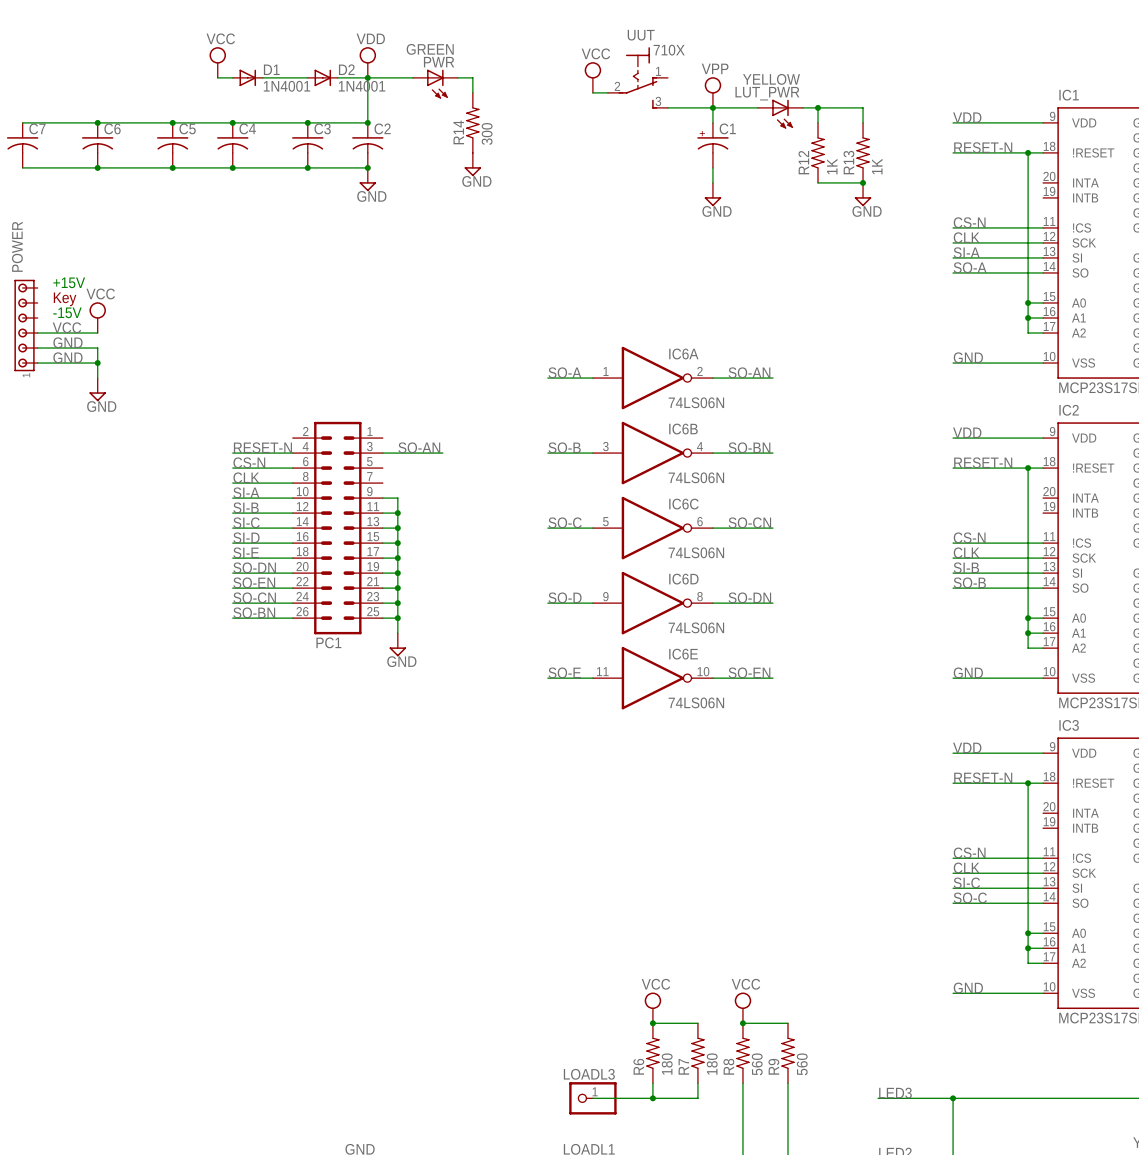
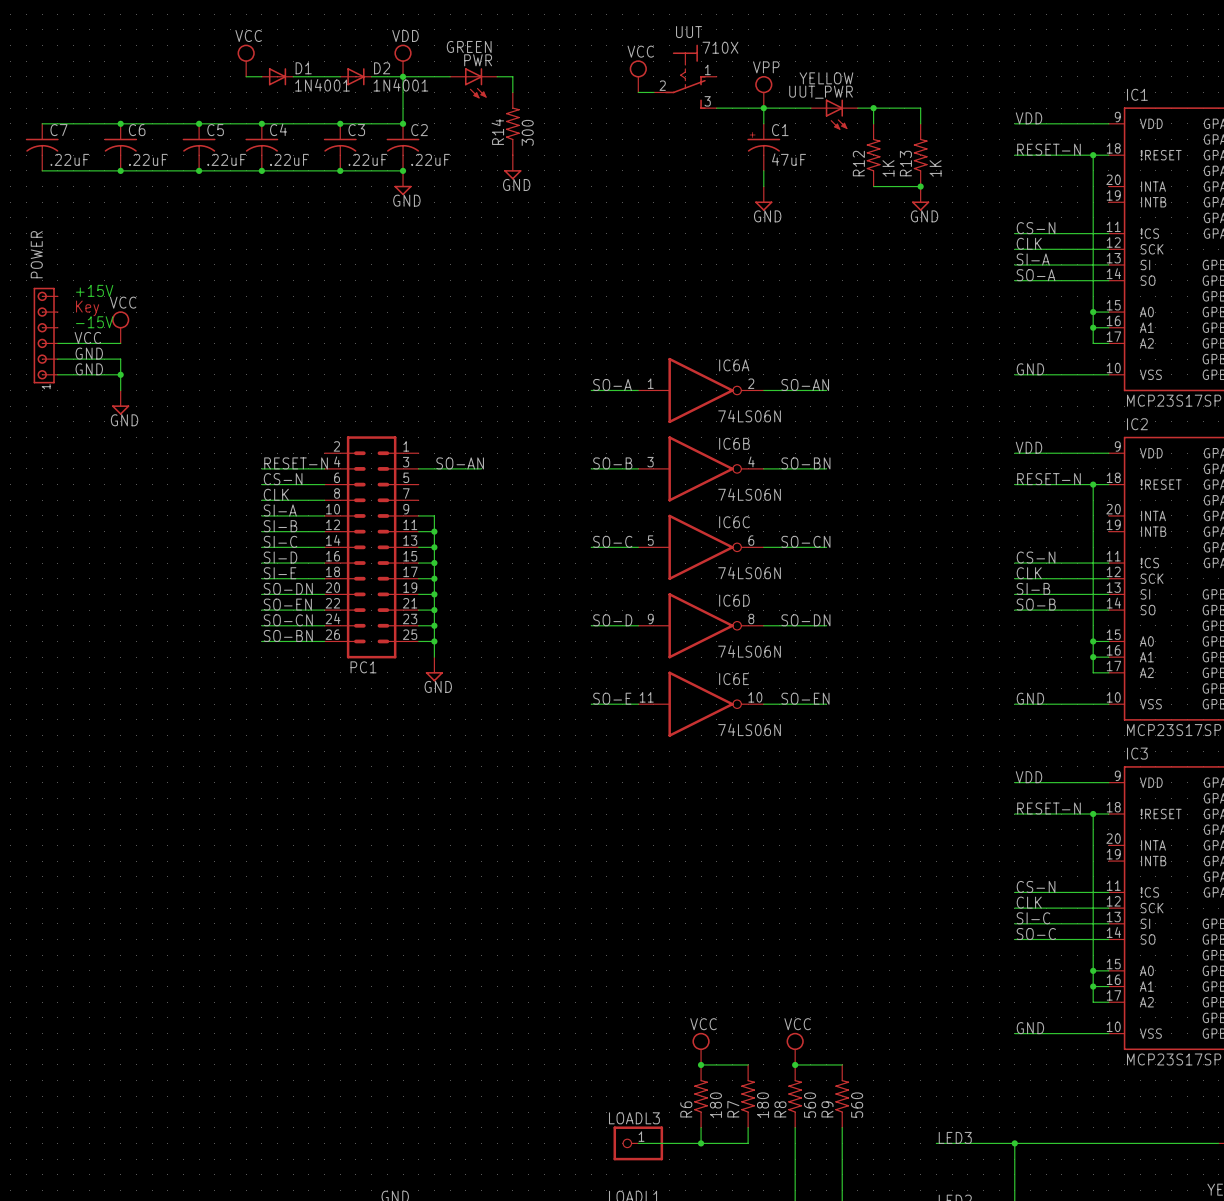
LUT_PWR name: LUT_PWR (767, 93) -> UUT_PWR (821, 92)
C7 value: none -> .22uF (69, 159)
C6 value: none -> .22uF (148, 159)
C5 value: none -> .22uF (226, 159)
C4 value: none -> .22uF (289, 159)
C3 value: none -> .22uF (367, 159)
C2 value: none -> .22uF (430, 159)
C1 value: none -> 47uF (789, 159)

